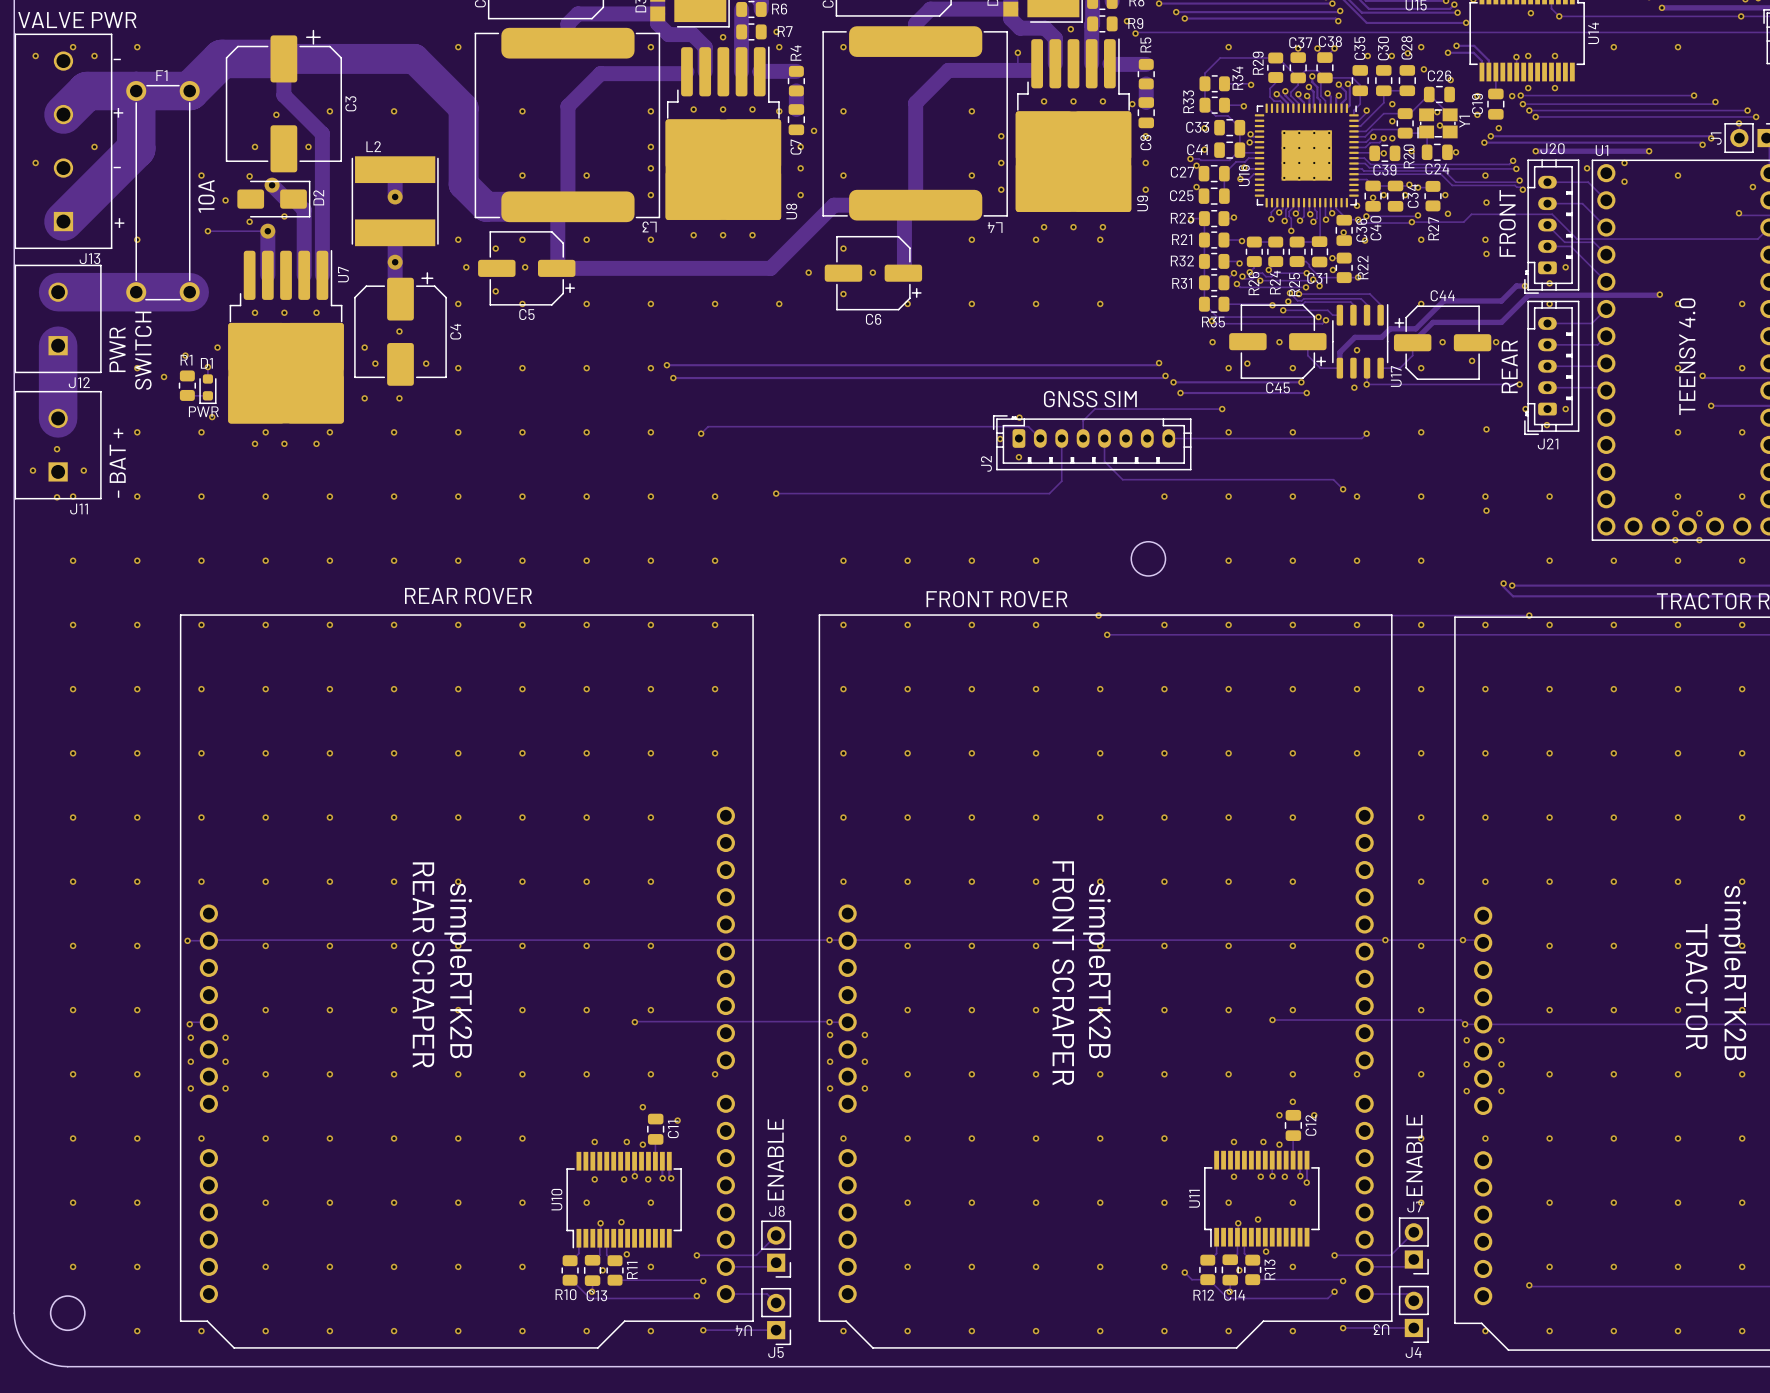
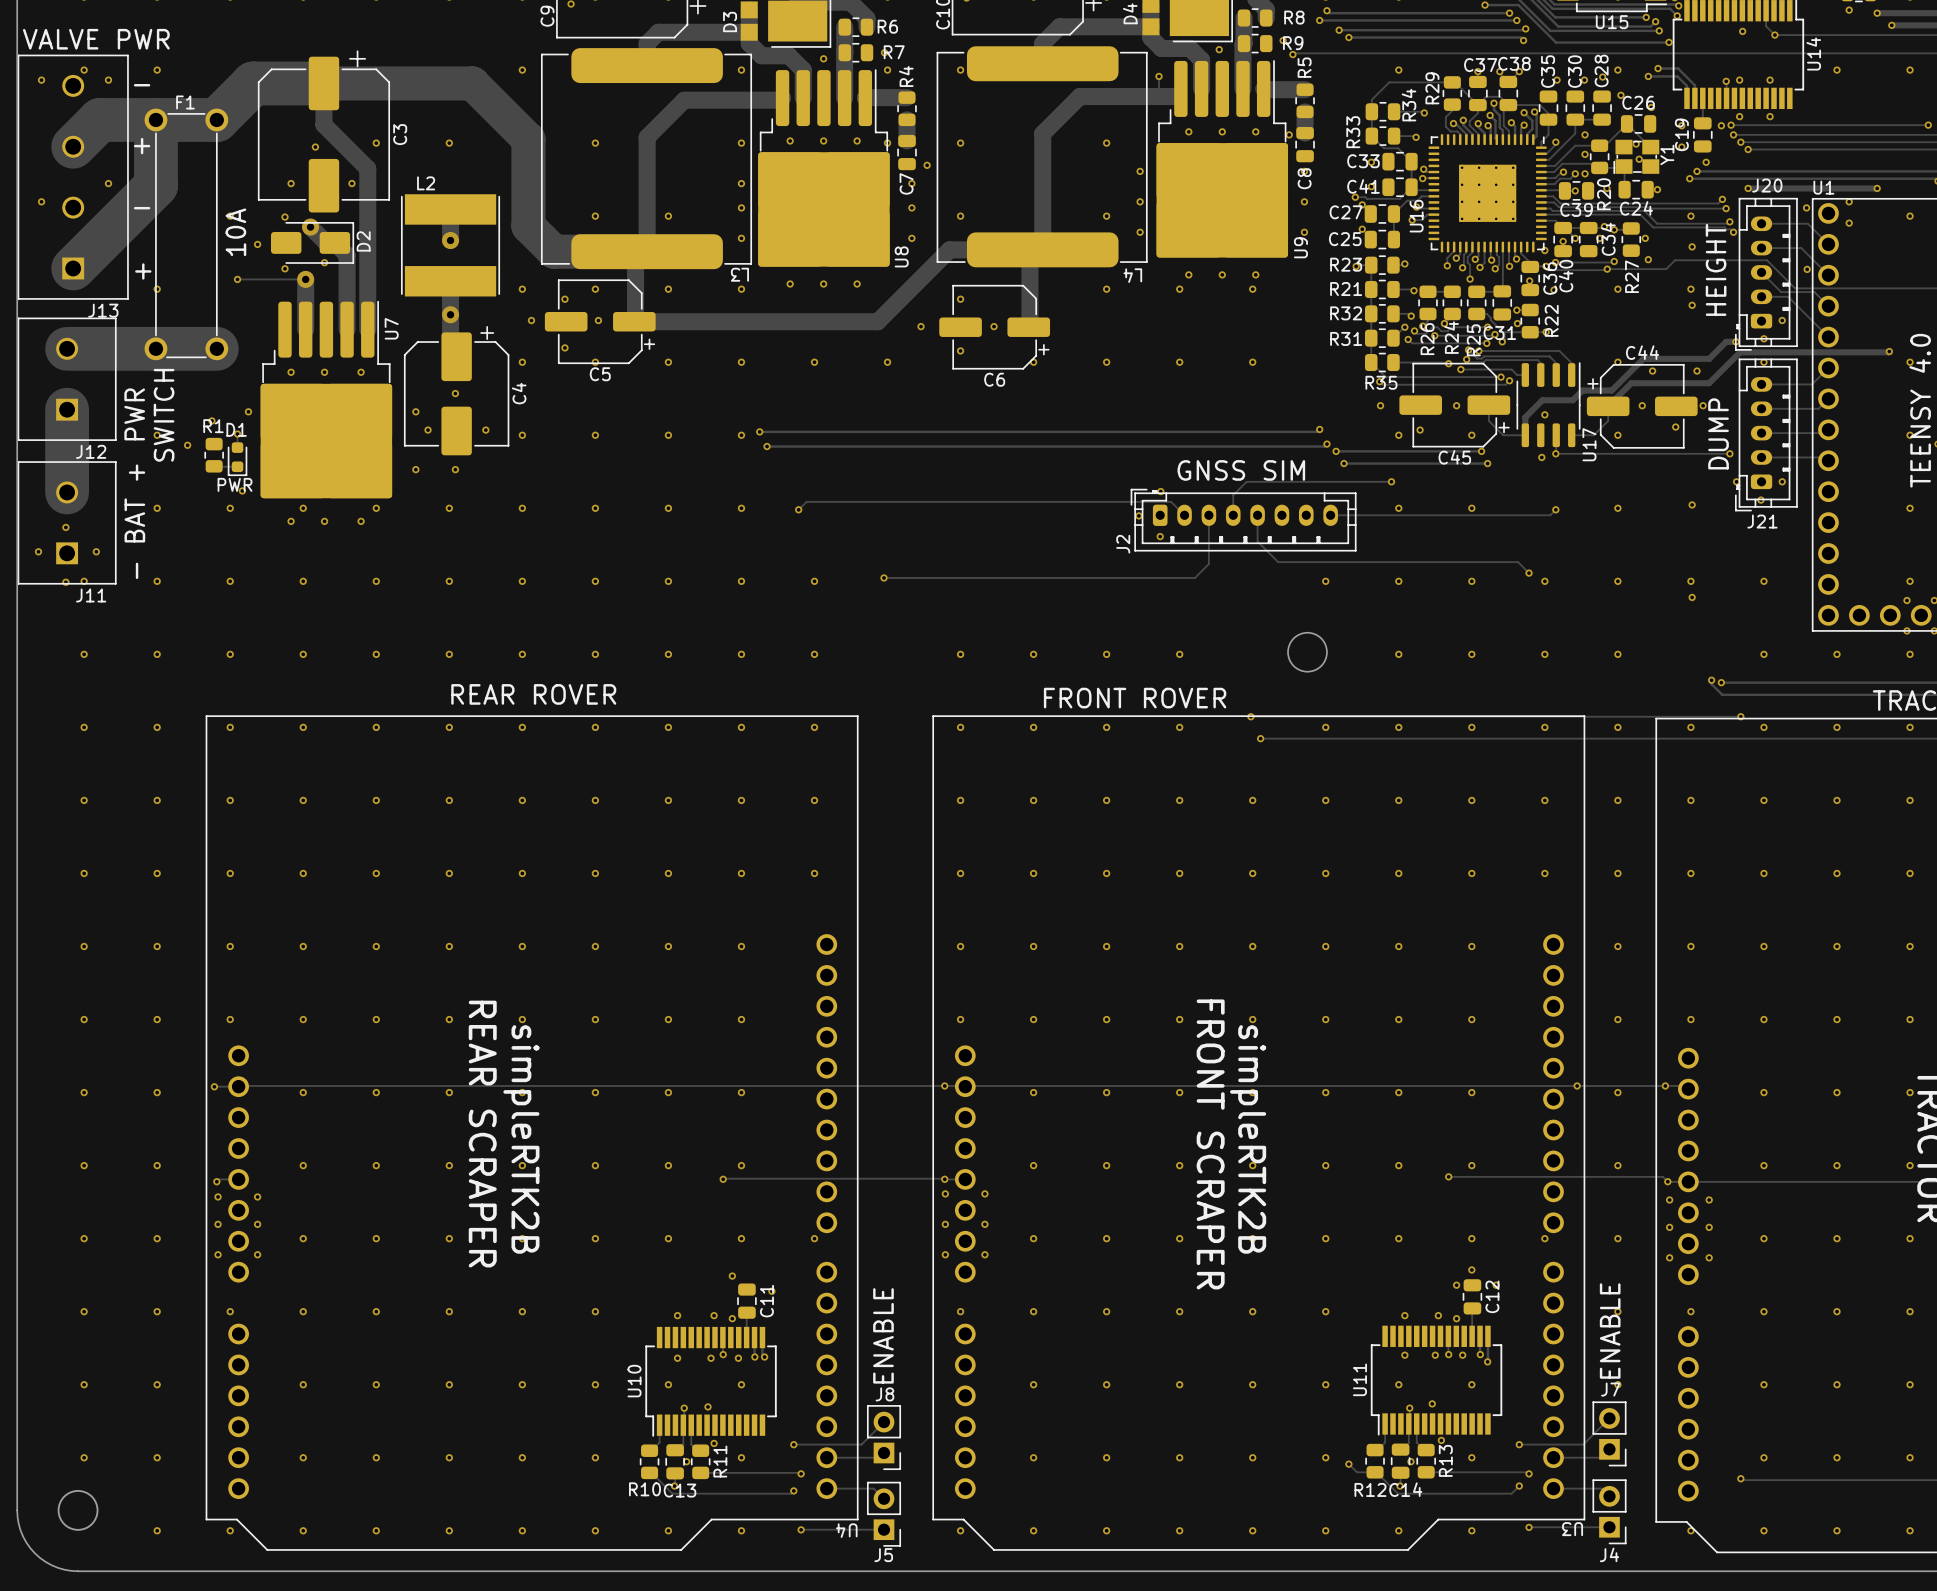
via: none -> (1807, 269)
text: FRONT (1507, 223) -> HEIGHT (1716, 269)
via: none -> (1652, 371)
via: none -> (1697, 371)
text: REAR (1509, 366) -> DUMP (1718, 433)

